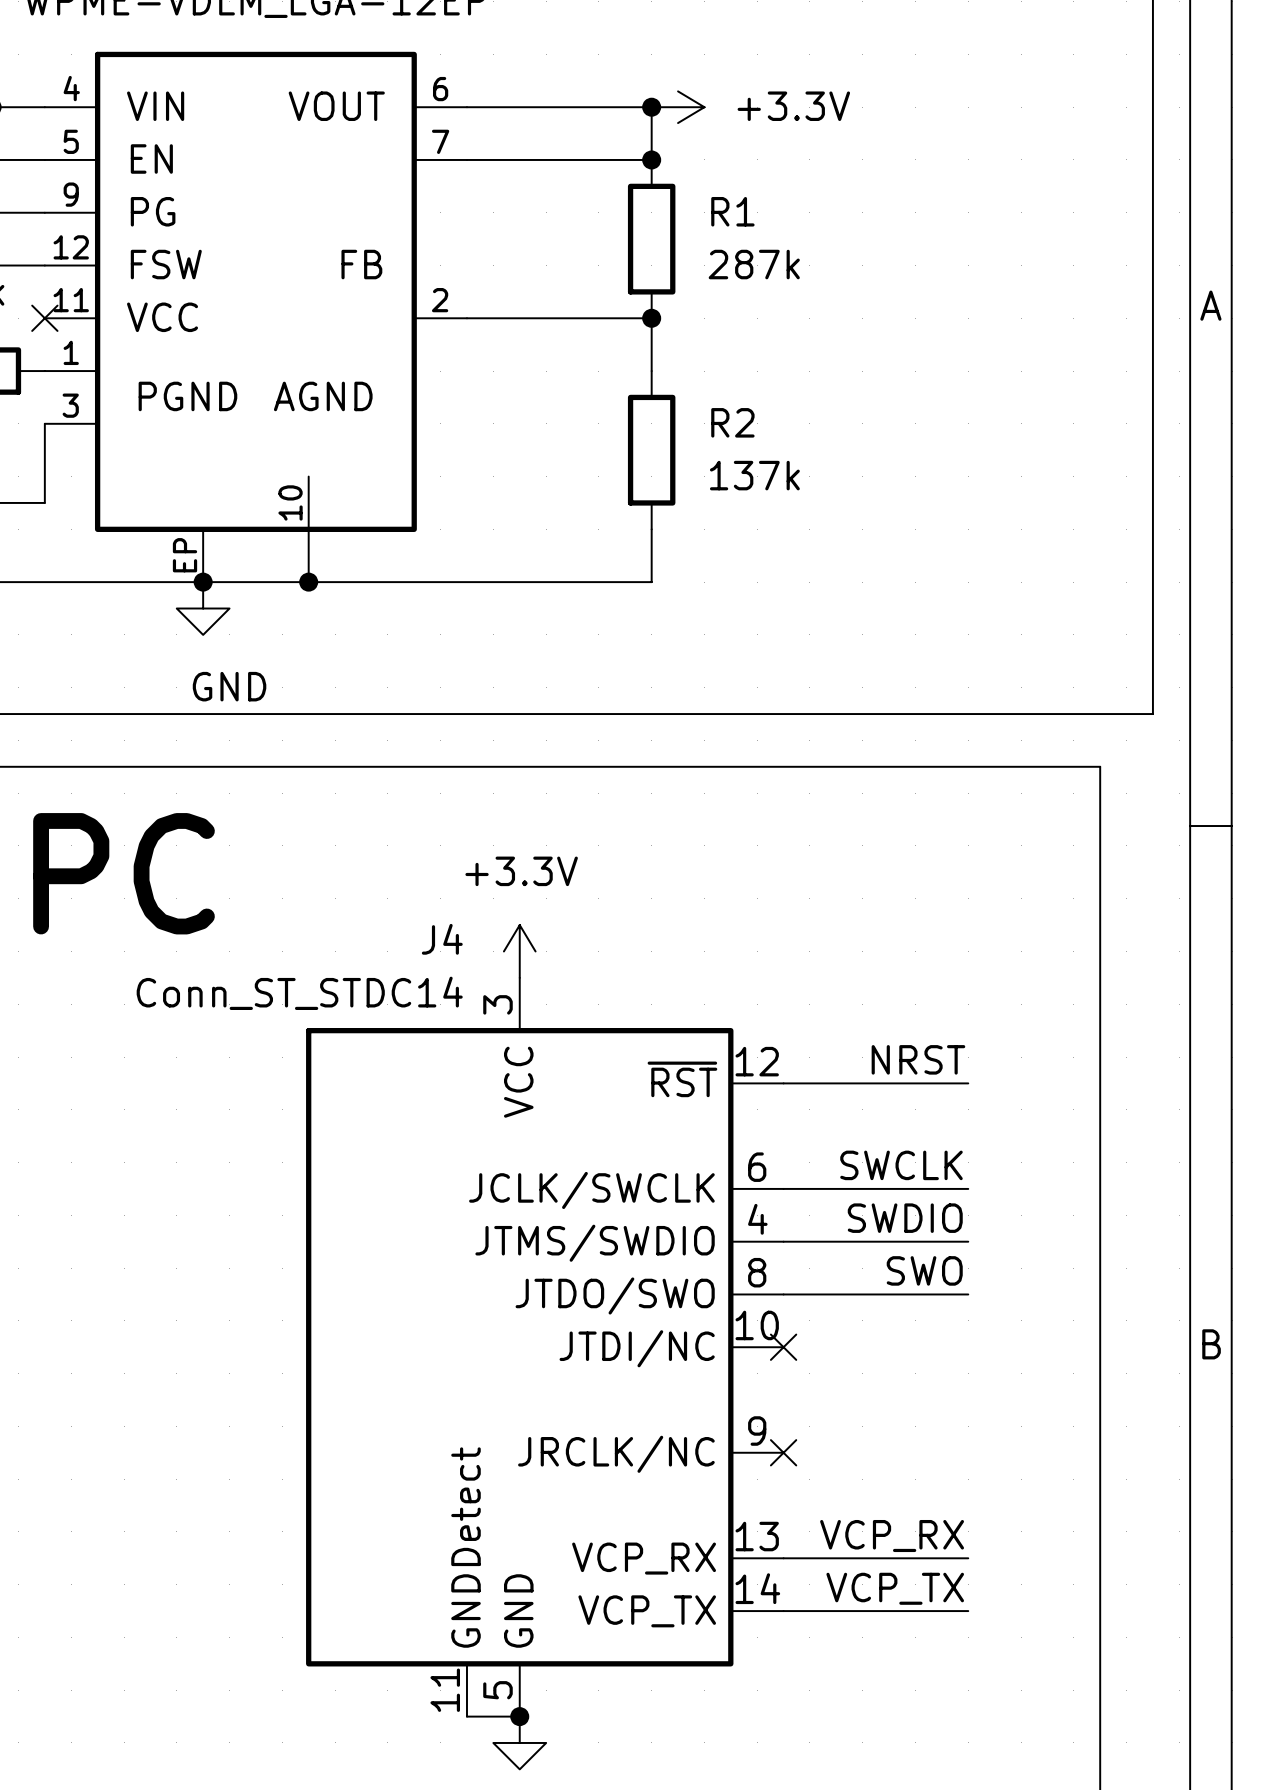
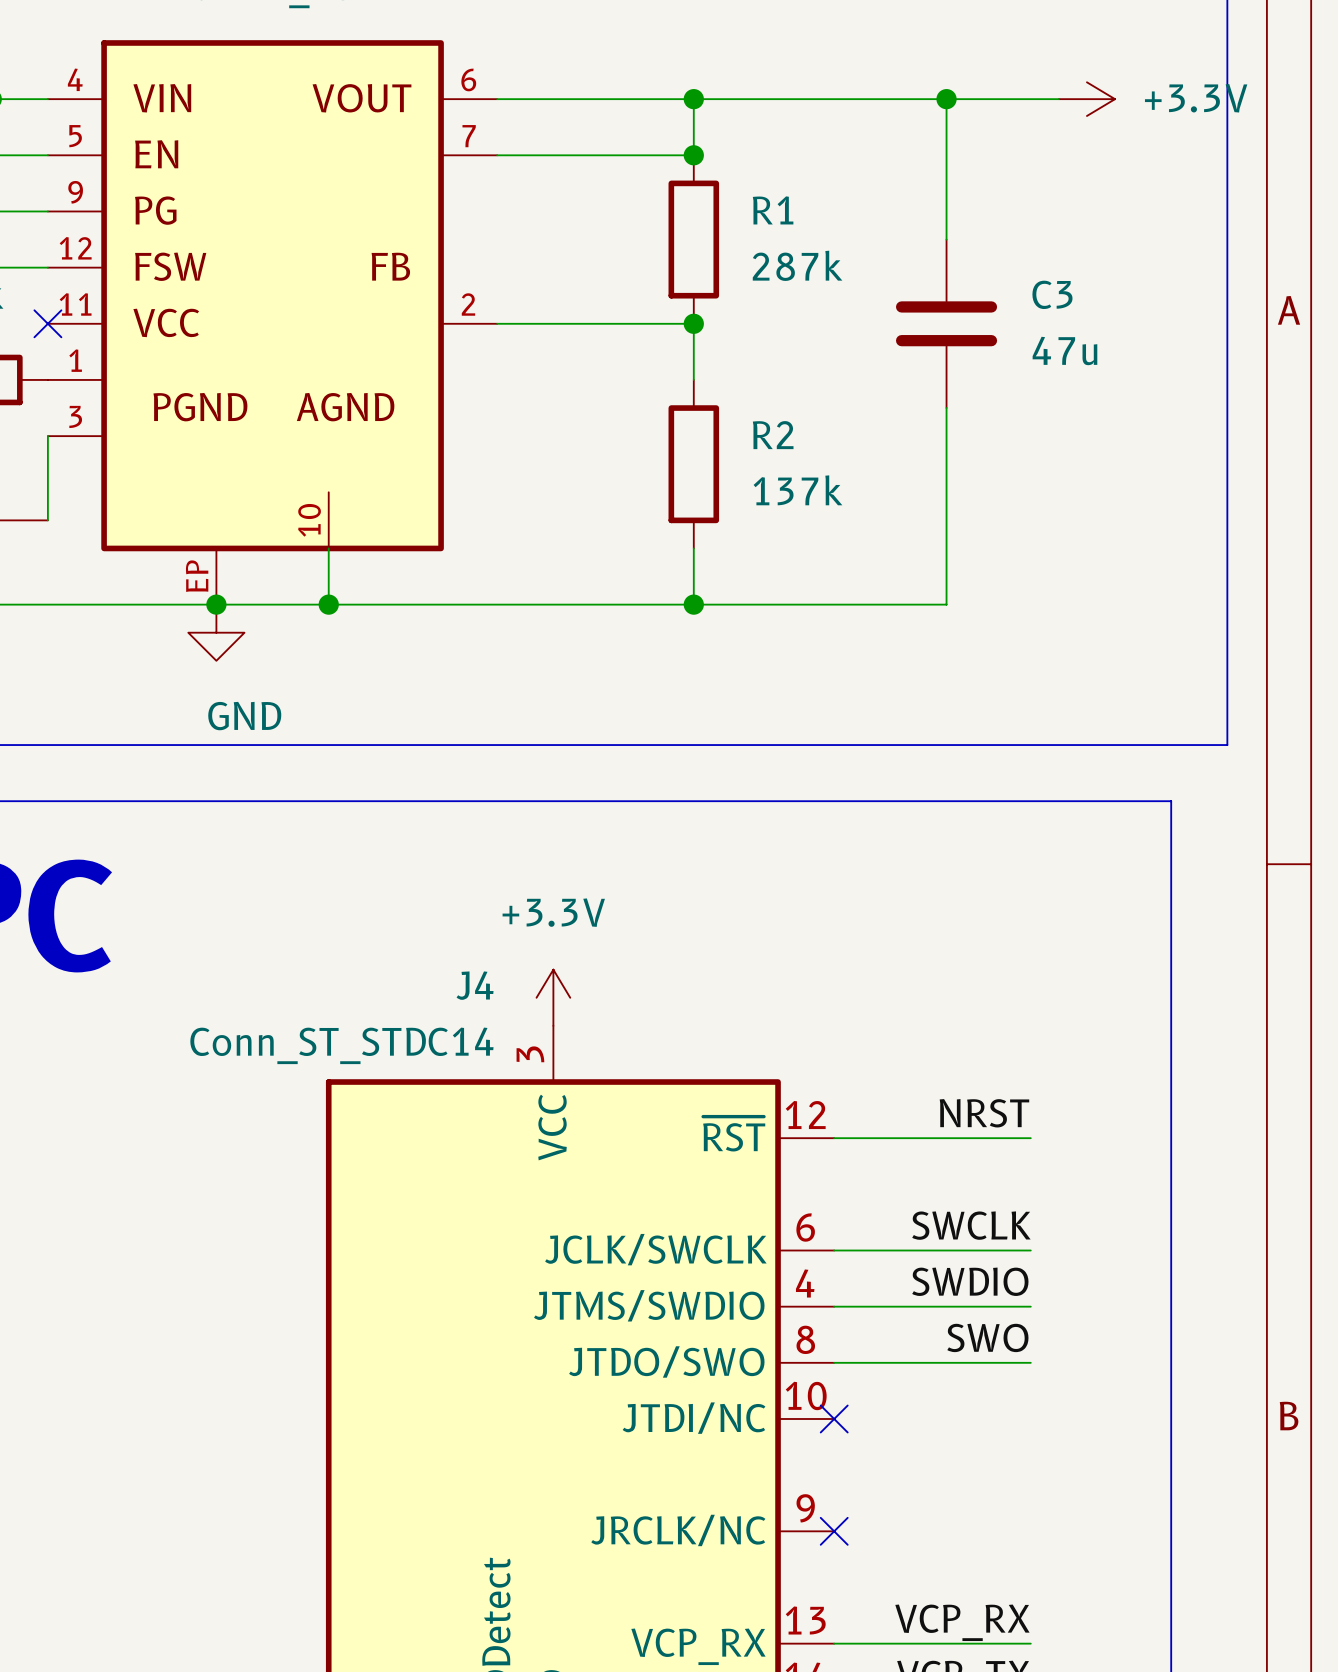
wire: none -> (693, 99) (1058, 99)
power symbol position: +3.3V (678, 107) -> +3.3V (1086, 99)
wire: none -> (946, 99) (946, 239)
junction: none -> (946, 99)
C3: none -> 47u (946, 323)
wire: none -> (946, 408) (946, 604) (693, 604)
junction: none -> (693, 604)

